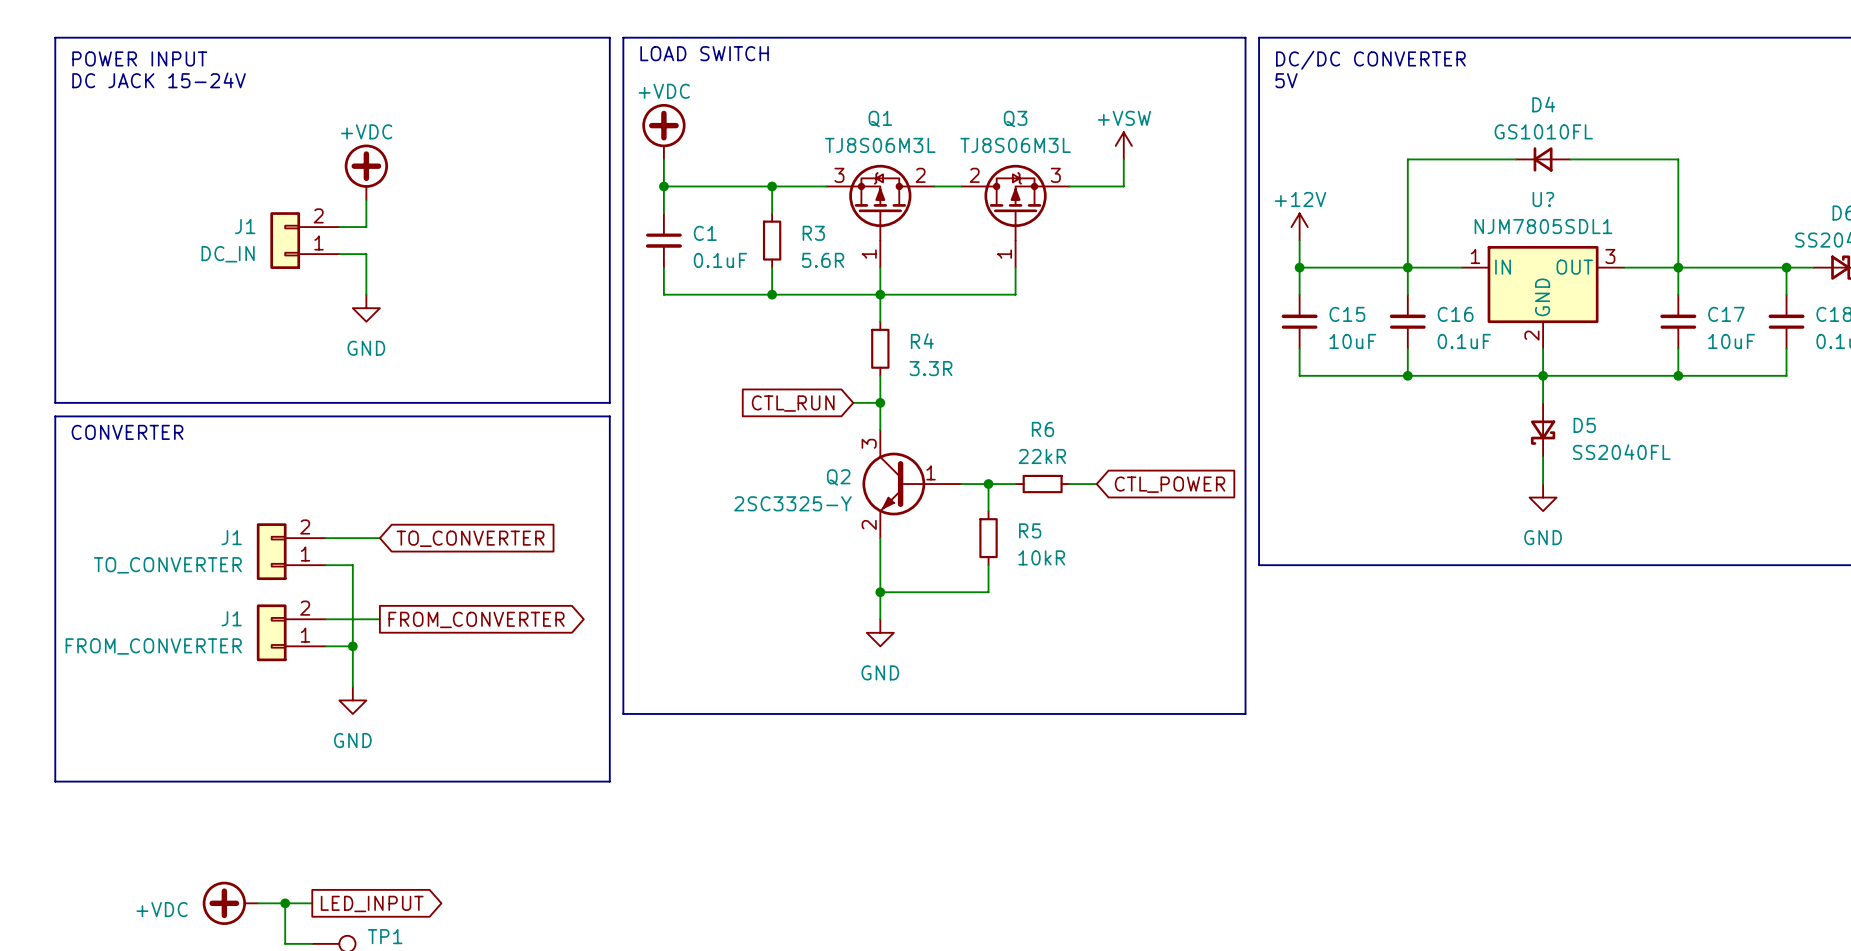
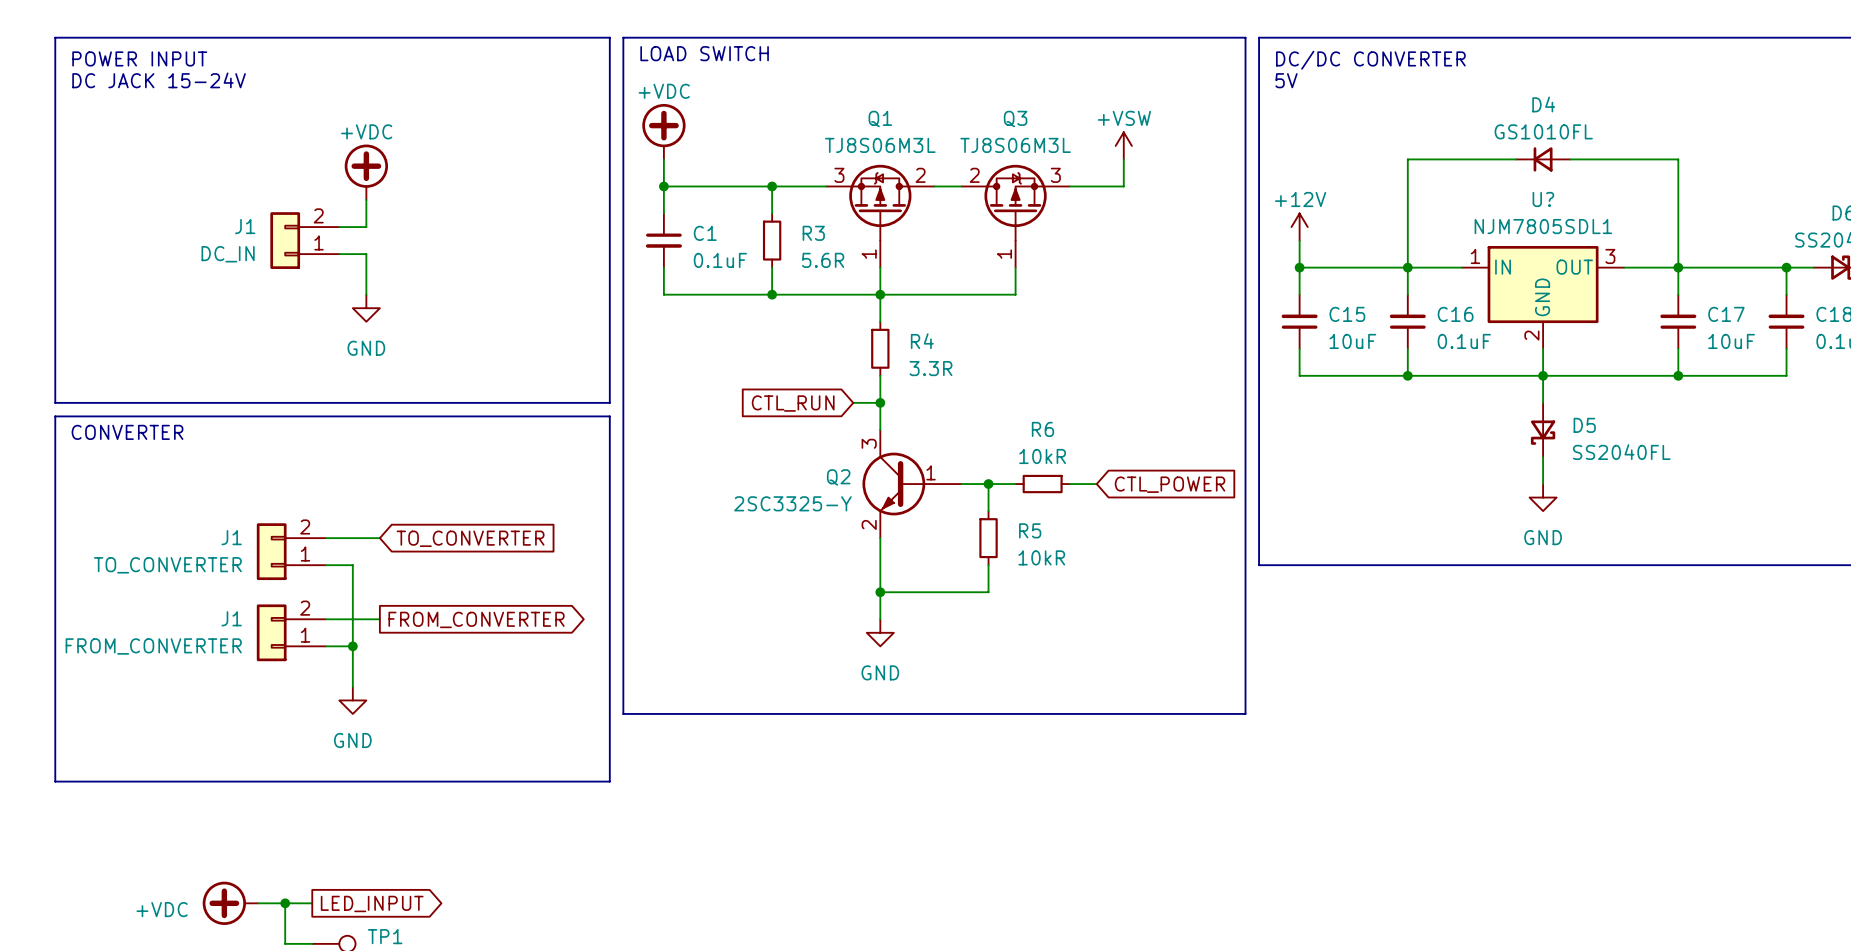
R6 value: 22kR (1042, 456) -> 10kR (1042, 456)

